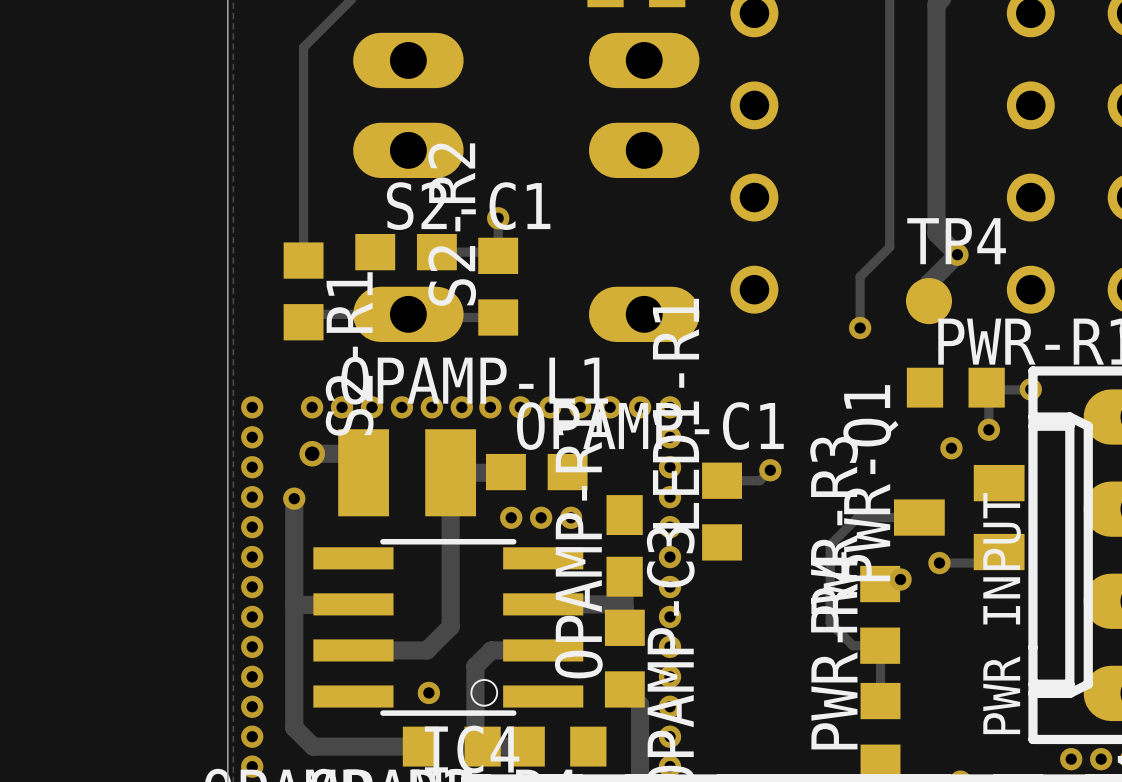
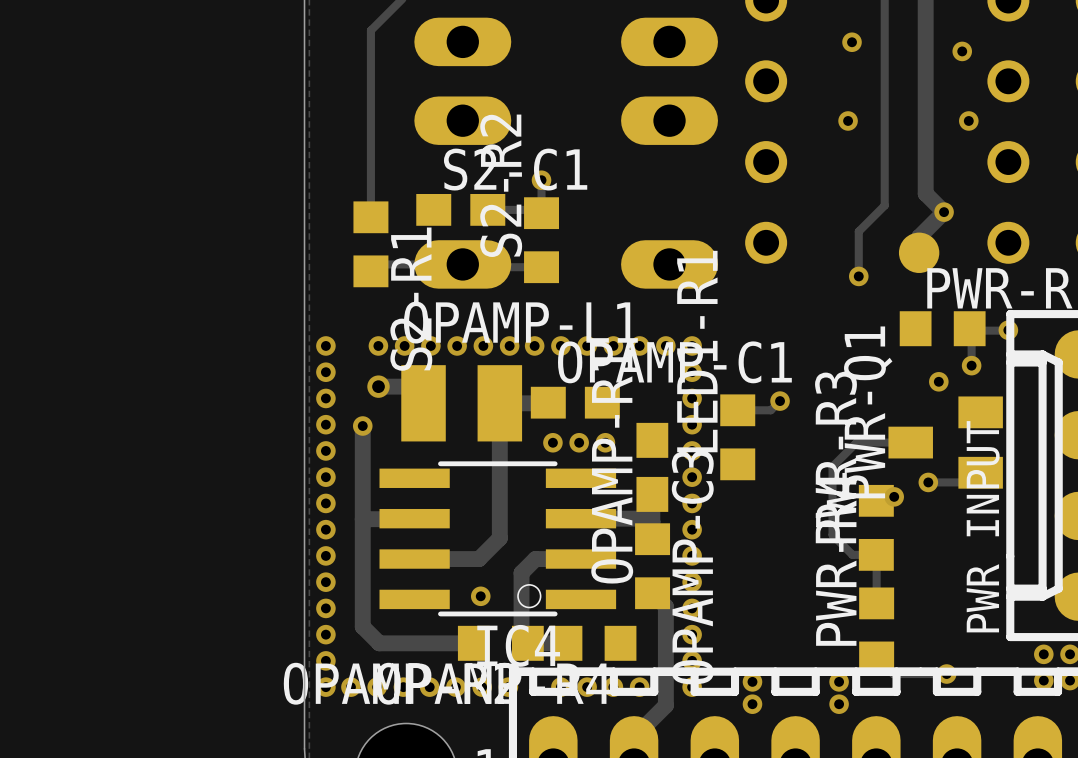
via: none -> (852, 42)
via: none -> (962, 51)
via: none -> (848, 120)
via: none -> (968, 120)
TP4 name: TP4 (956, 241) -> none

